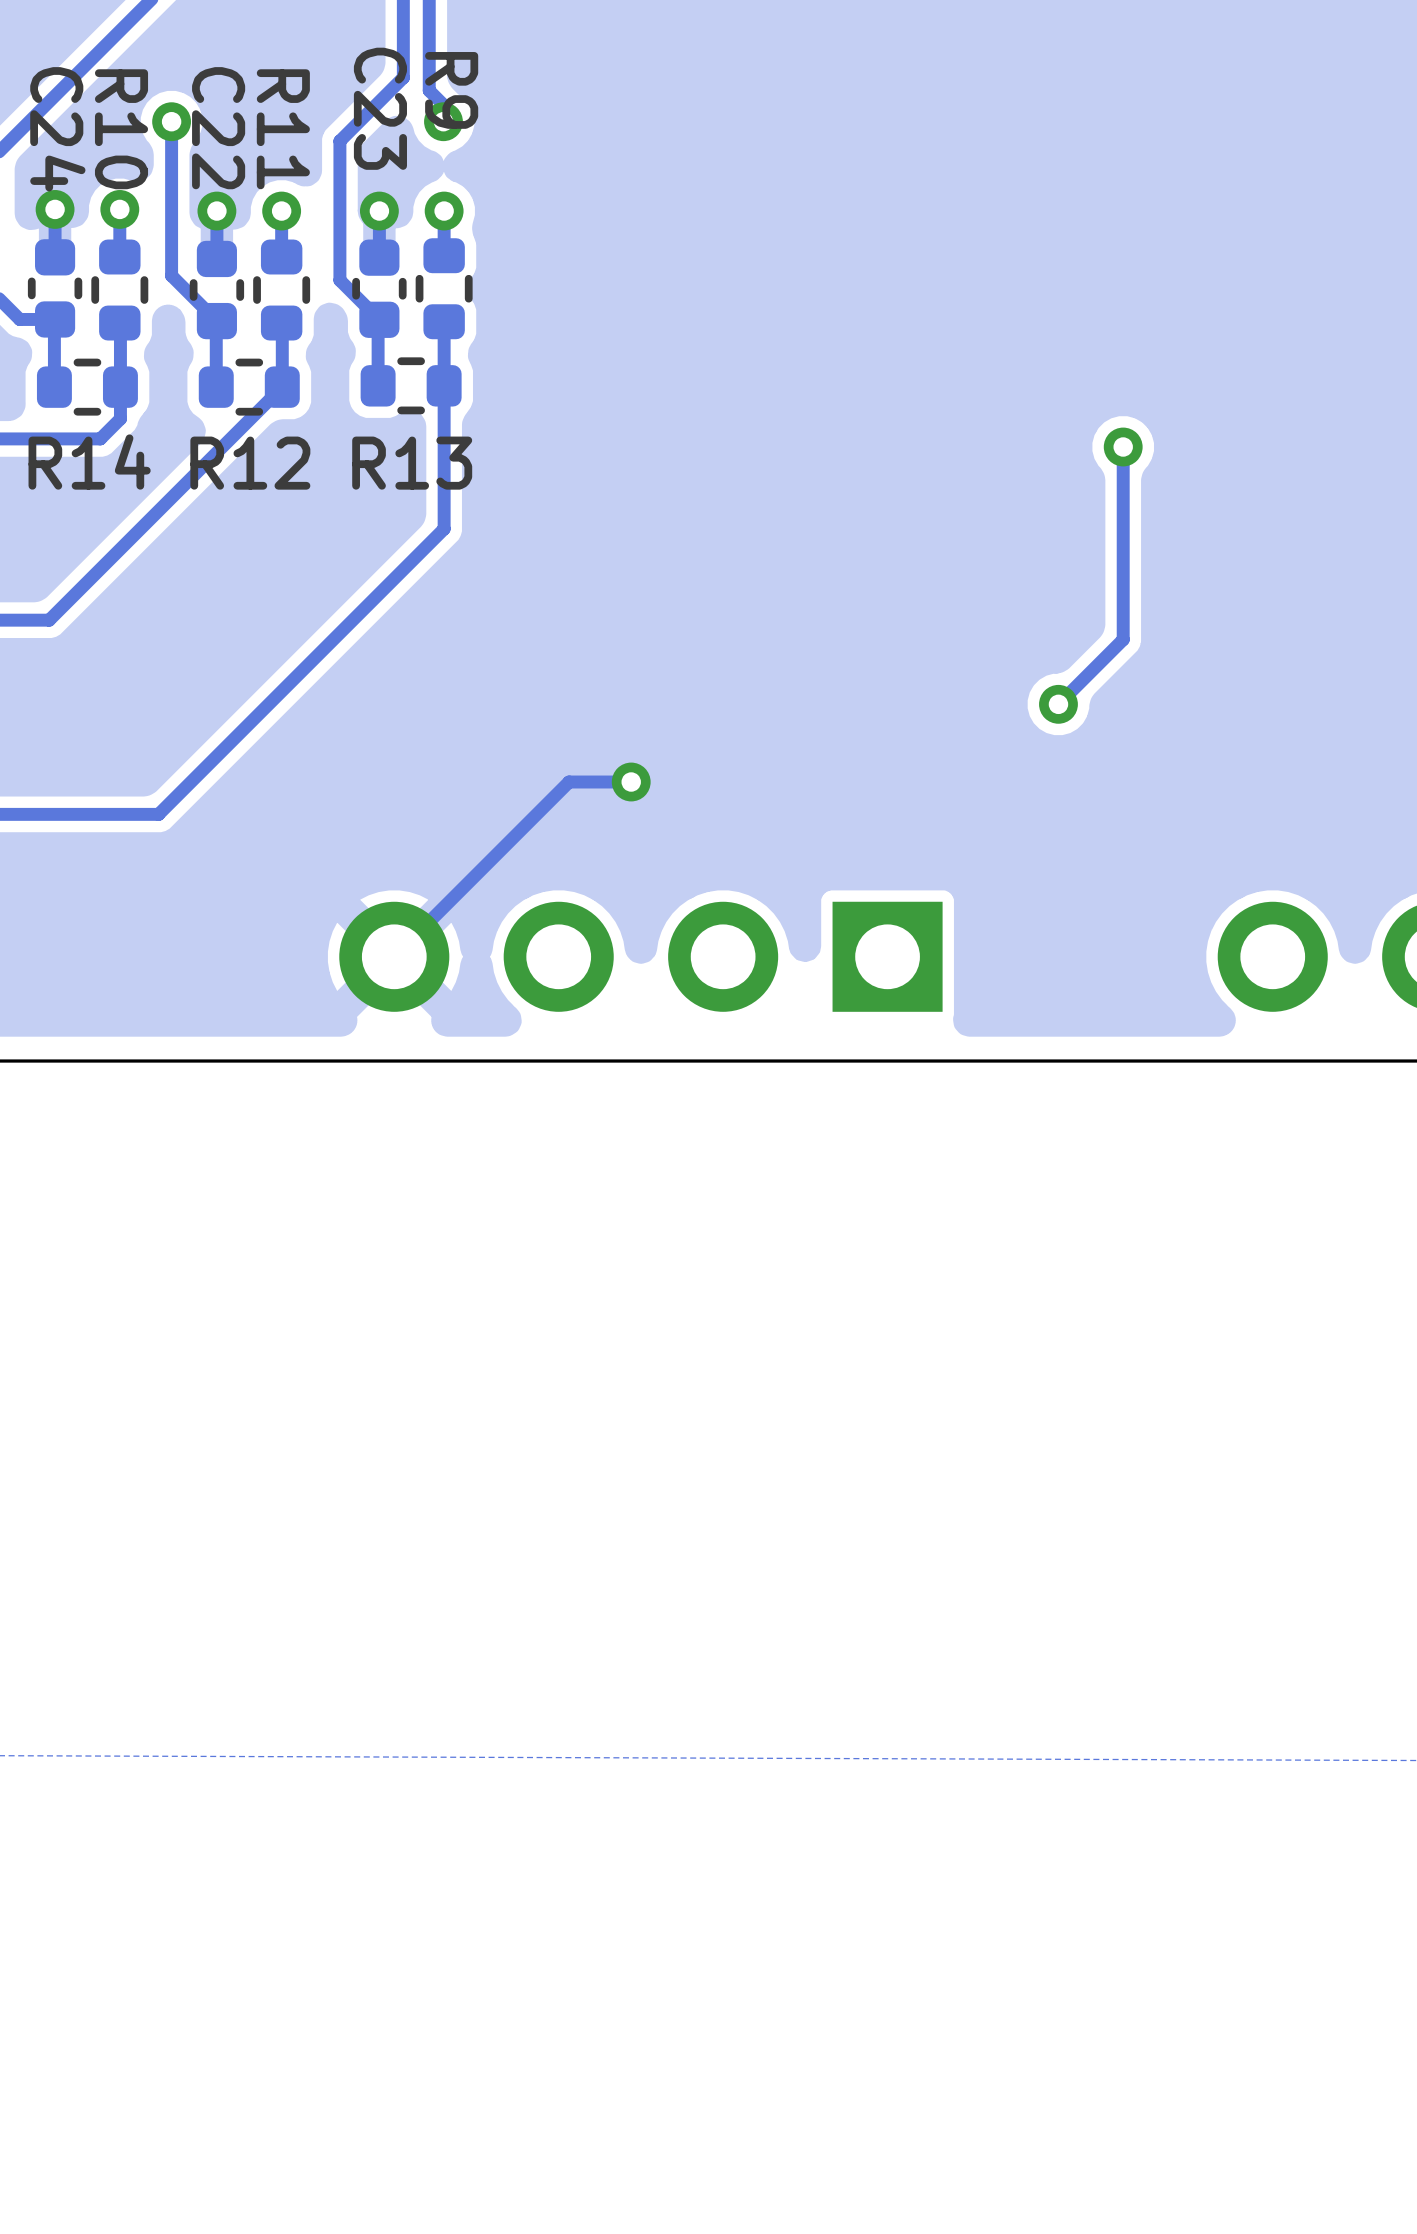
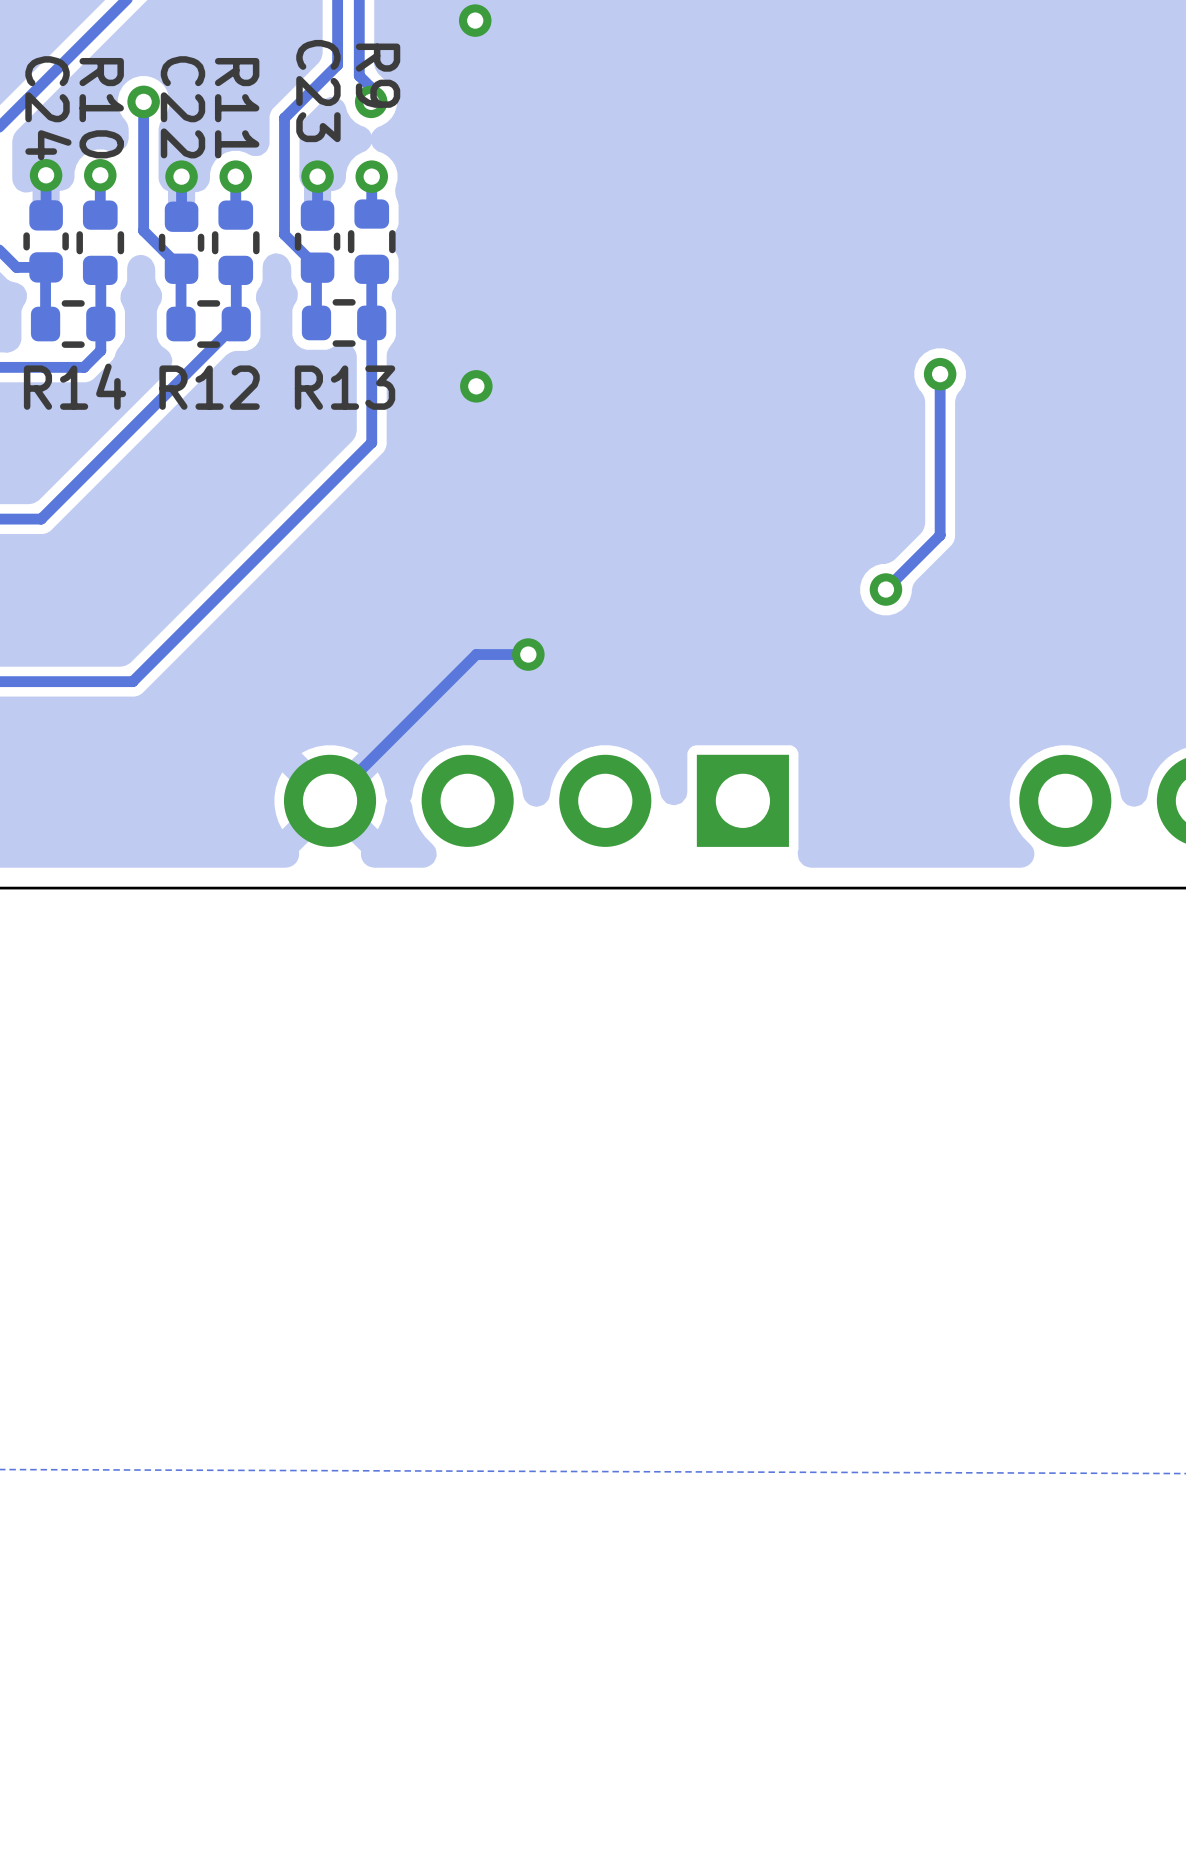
via: none -> (475, 20)
via: none -> (476, 386)

